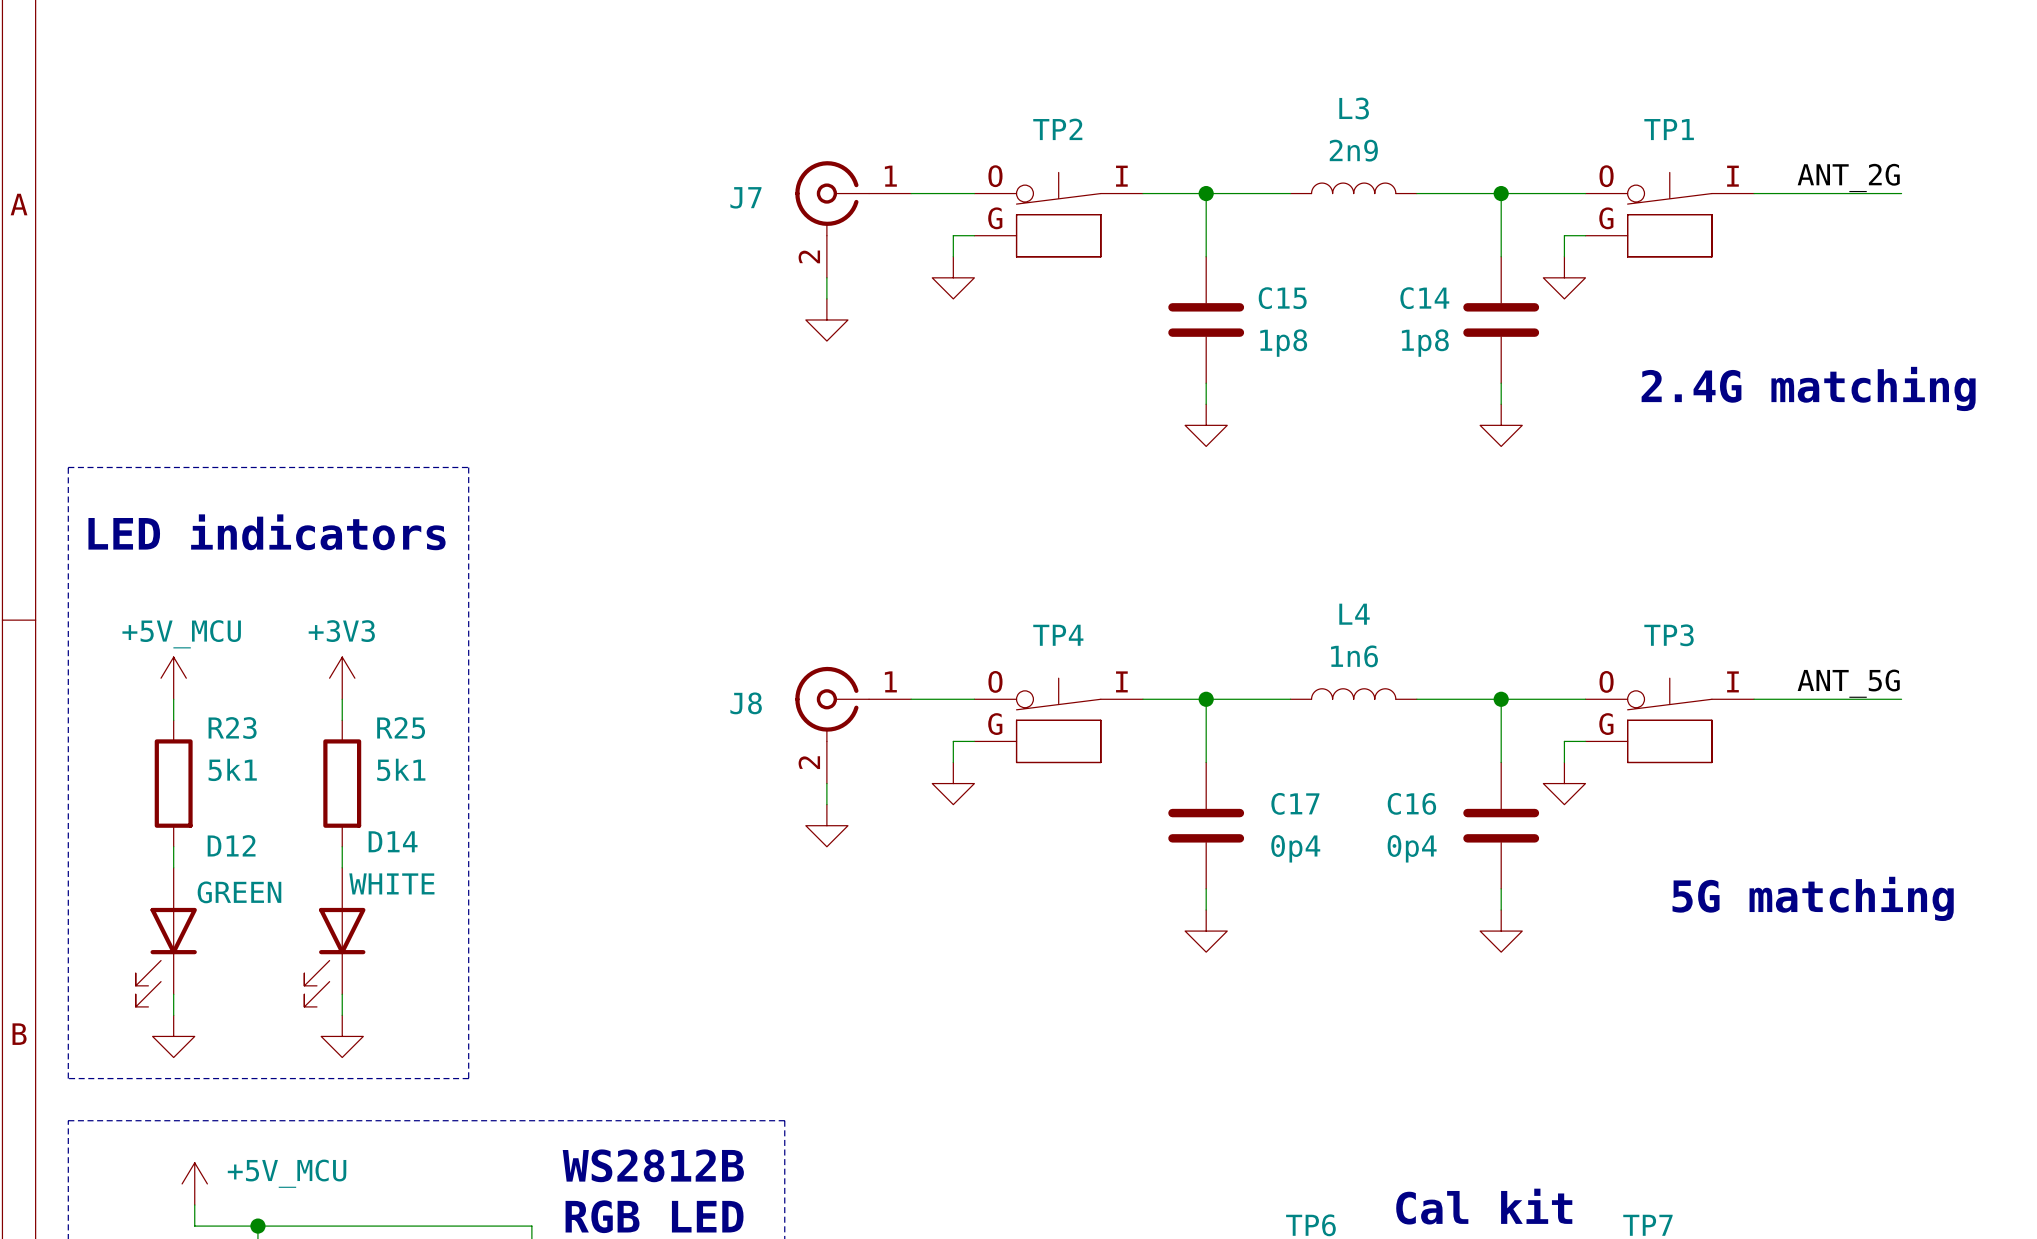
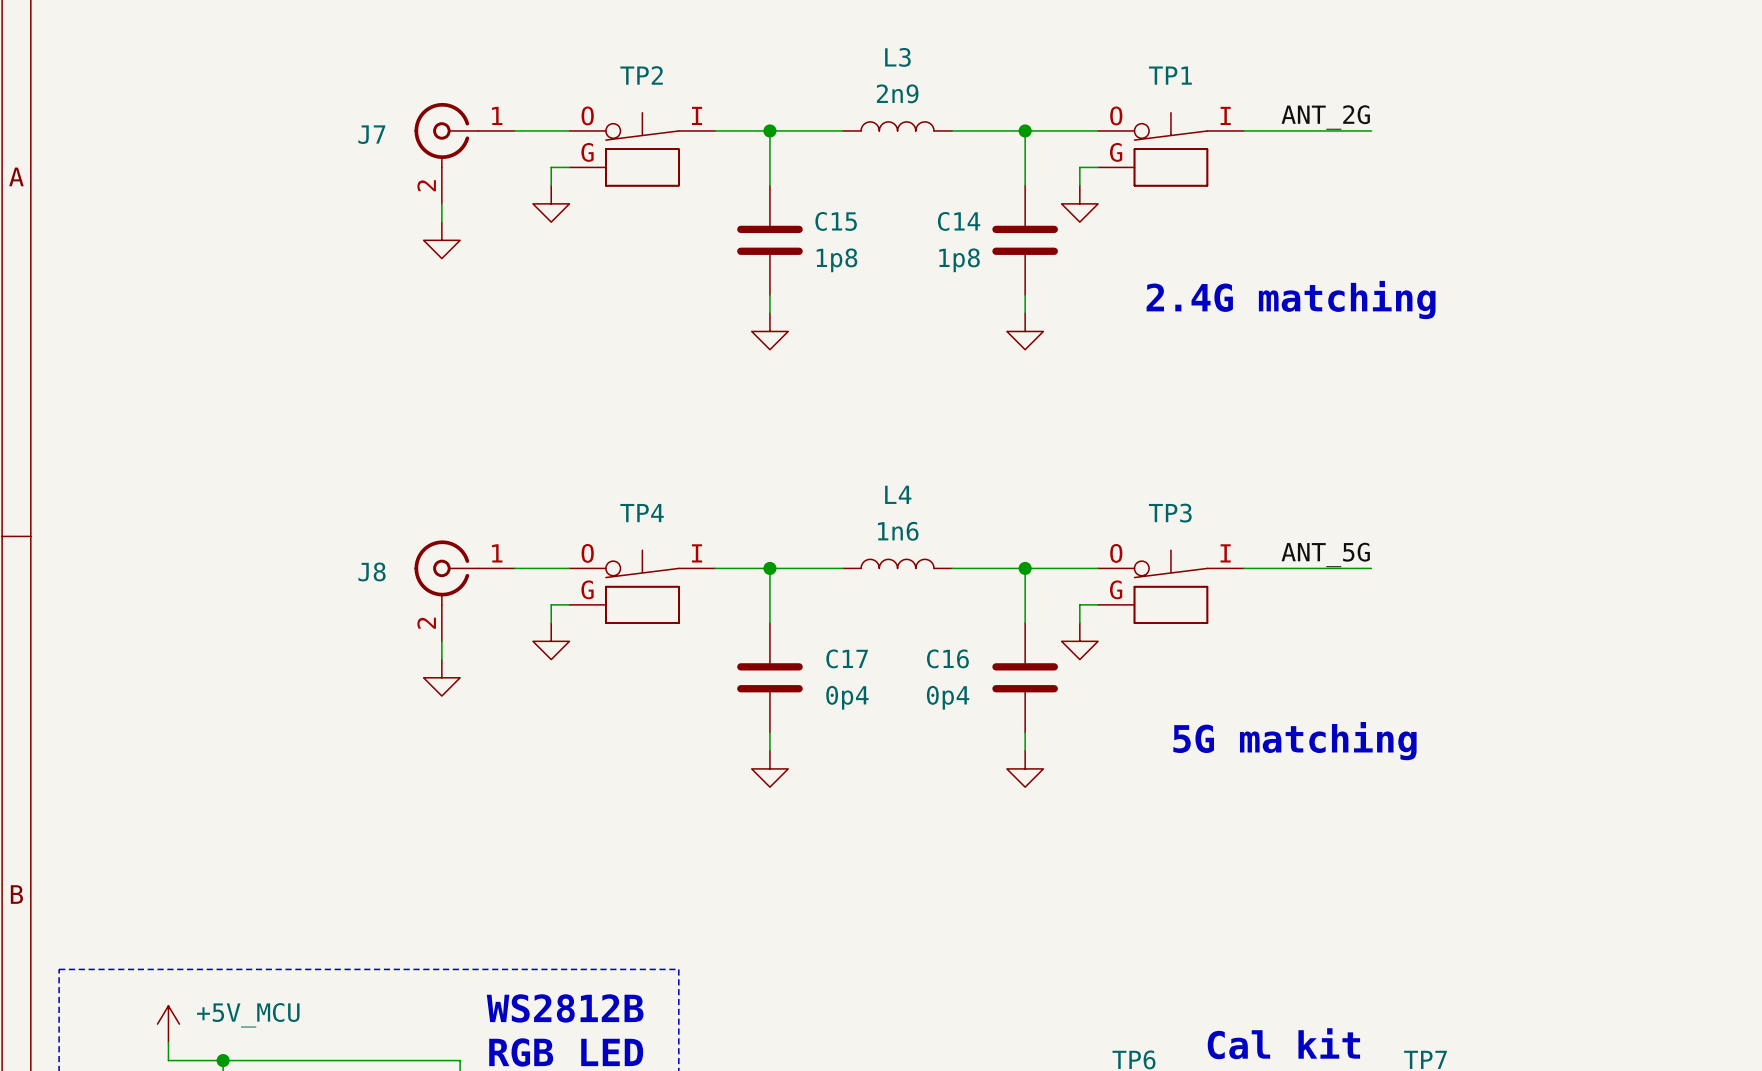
wire: none -> (715, 130) (842, 130)
junction: none -> (769, 130)
label position: ANT_2G (1848, 177) -> ANT_2G (1325, 117)
L3 position: (1353, 188) -> (897, 126)
wire: (911, 193) (974, 193) -> (514, 130) (569, 130)
wire: (1142, 193) (1248, 193) -> (1079, 185) (1079, 167)
wire: (1206, 193) (1206, 256) -> (769, 130) (769, 185)
junction position: (1206, 193) -> (1025, 130)
wire: (1416, 193) (1585, 193) -> (952, 130) (1098, 130)
wire: (1501, 193) (1501, 256) -> (1025, 130) (1025, 185)
junction: (1501, 193) -> none
wire: (1754, 193) (1901, 193) -> (1243, 130) (1371, 130)
TP2 position: (1058, 214) -> (642, 149)
TP1 position: (1669, 214) -> (1170, 149)
J7 position: (853, 219) -> (464, 153)
power symbol: none -> (551, 203)
wire: (974, 235) (953, 235) (953, 256) -> (569, 167) (551, 167) (551, 185)
power symbol: none -> (1079, 203)
wire: (1585, 235) (1564, 235) (1564, 256) -> none
power symbol: none -> (441, 240)
wire: (826, 277) (826, 298) -> (441, 203) (441, 222)
power symbol: (953, 277) -> none
power symbol: (1564, 277) -> none
power symbol: (826, 319) -> none
C15 position: (1206, 319) -> (769, 240)
C14 position: (1501, 319) -> (1025, 240)
power symbol: none -> (769, 331)
wire: (1206, 383) (1206, 404) -> (769, 295) (769, 313)
wire: (1501, 383) (1501, 404) -> (1025, 295) (1025, 313)
text position: 2.4G matching (1808, 388) -> 2.4G matching (1291, 300)
power symbol position: (1206, 425) -> (1025, 331)
power symbol: (1501, 425) -> none
line: (68, 467) (468, 467) (468, 1078) (68, 1078) (68, 467) -> none
text: LED indicators (267, 532) -> none
wire: none -> (715, 568) (842, 568)
junction: none -> (769, 568)
power symbol: +5V_MCU (173, 678) -> none
power symbol: +3V3 (342, 678) -> none
label position: ANT_5G (1848, 683) -> ANT_5G (1325, 554)
L4 position: (1353, 694) -> (897, 563)
wire: (173, 699) (173, 720) -> none
wire: (342, 699) (342, 720) -> none
wire: (911, 699) (974, 699) -> (514, 568) (569, 568)
wire: (1142, 699) (1248, 699) -> (1079, 623) (1079, 604)
wire: (1206, 699) (1206, 762) -> (769, 568) (769, 623)
junction position: (1206, 699) -> (1025, 568)
wire: (1416, 699) (1585, 699) -> (952, 568) (1098, 568)
wire: (1501, 699) (1501, 762) -> (1025, 568) (1025, 623)
junction: (1501, 699) -> none
wire: (1754, 699) (1901, 699) -> (1243, 568) (1371, 568)
TP4 position: (1058, 720) -> (642, 586)
TP3 position: (1669, 720) -> (1170, 586)
J8 position: (853, 725) -> (464, 590)
power symbol: none -> (551, 641)
wire: (974, 741) (953, 741) (953, 762) -> (569, 604) (551, 604) (551, 623)
power symbol: none -> (1079, 641)
wire: (1585, 741) (1564, 741) (1564, 762) -> none
R23: 5k1 (173, 783) -> none
R25: 5k1 (342, 783) -> none
power symbol: none -> (441, 677)
wire: (826, 783) (826, 804) -> (441, 641) (441, 659)
power symbol: (953, 783) -> none
power symbol: (1564, 783) -> none
power symbol: (826, 825) -> none
C17 position: (1206, 825) -> (769, 677)
C16 position: (1501, 825) -> (1025, 677)
wire: (173, 846) (173, 867) -> none
wire: (342, 846) (342, 867) -> none
power symbol: none -> (769, 768)
wire: (1206, 888) (1206, 910) -> (769, 732) (769, 750)
wire: (1501, 888) (1501, 910) -> (1025, 732) (1025, 750)
text position: 5G matching (1813, 898) -> 5G matching (1294, 741)
power symbol position: (1206, 931) -> (1025, 768)
power symbol: (1501, 931) -> none
D12: GREEN (166, 937) -> none
D14: WHITE (334, 937) -> none
wire: (173, 994) (173, 1015) -> none
wire: (342, 994) (342, 1015) -> none
power symbol: (173, 1036) -> none
power symbol: (342, 1036) -> none

